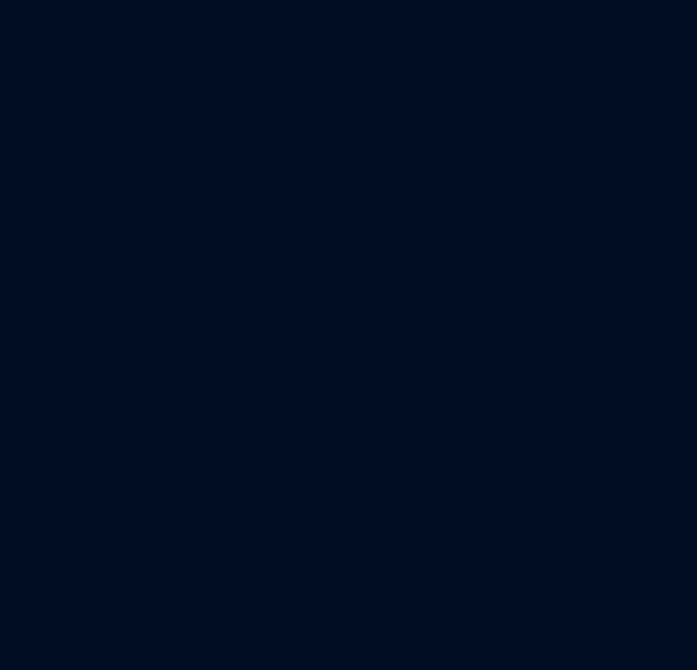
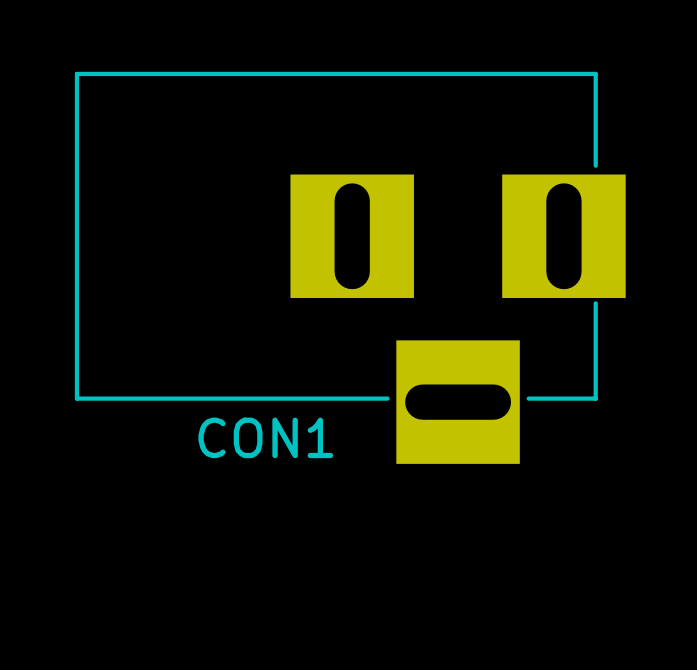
CON1: none -> (350, 267)

